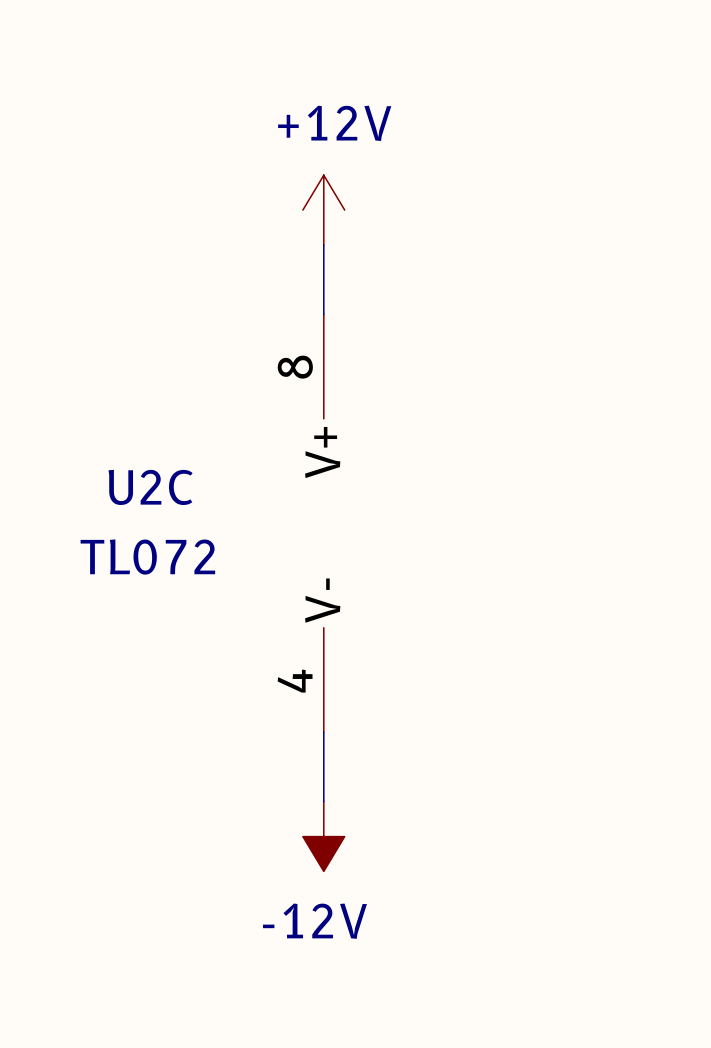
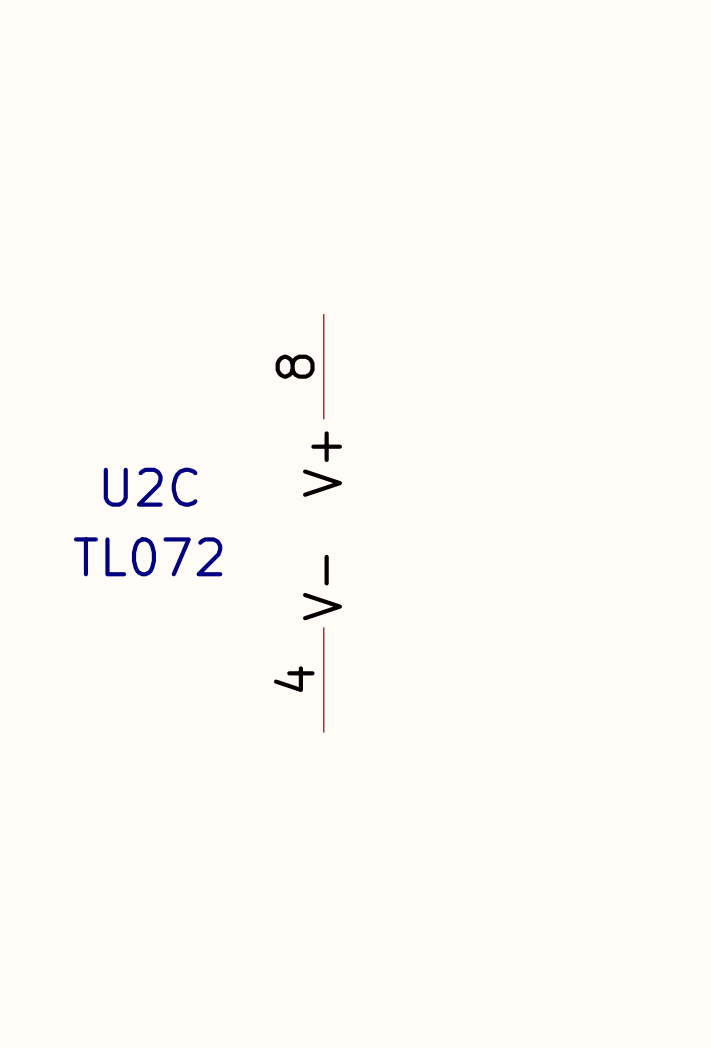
power symbol: +12V (323, 210) -> none
wire: (323, 244) (323, 314) -> none
wire: (323, 732) (323, 801) -> none
power symbol: -12V (323, 836) -> none

